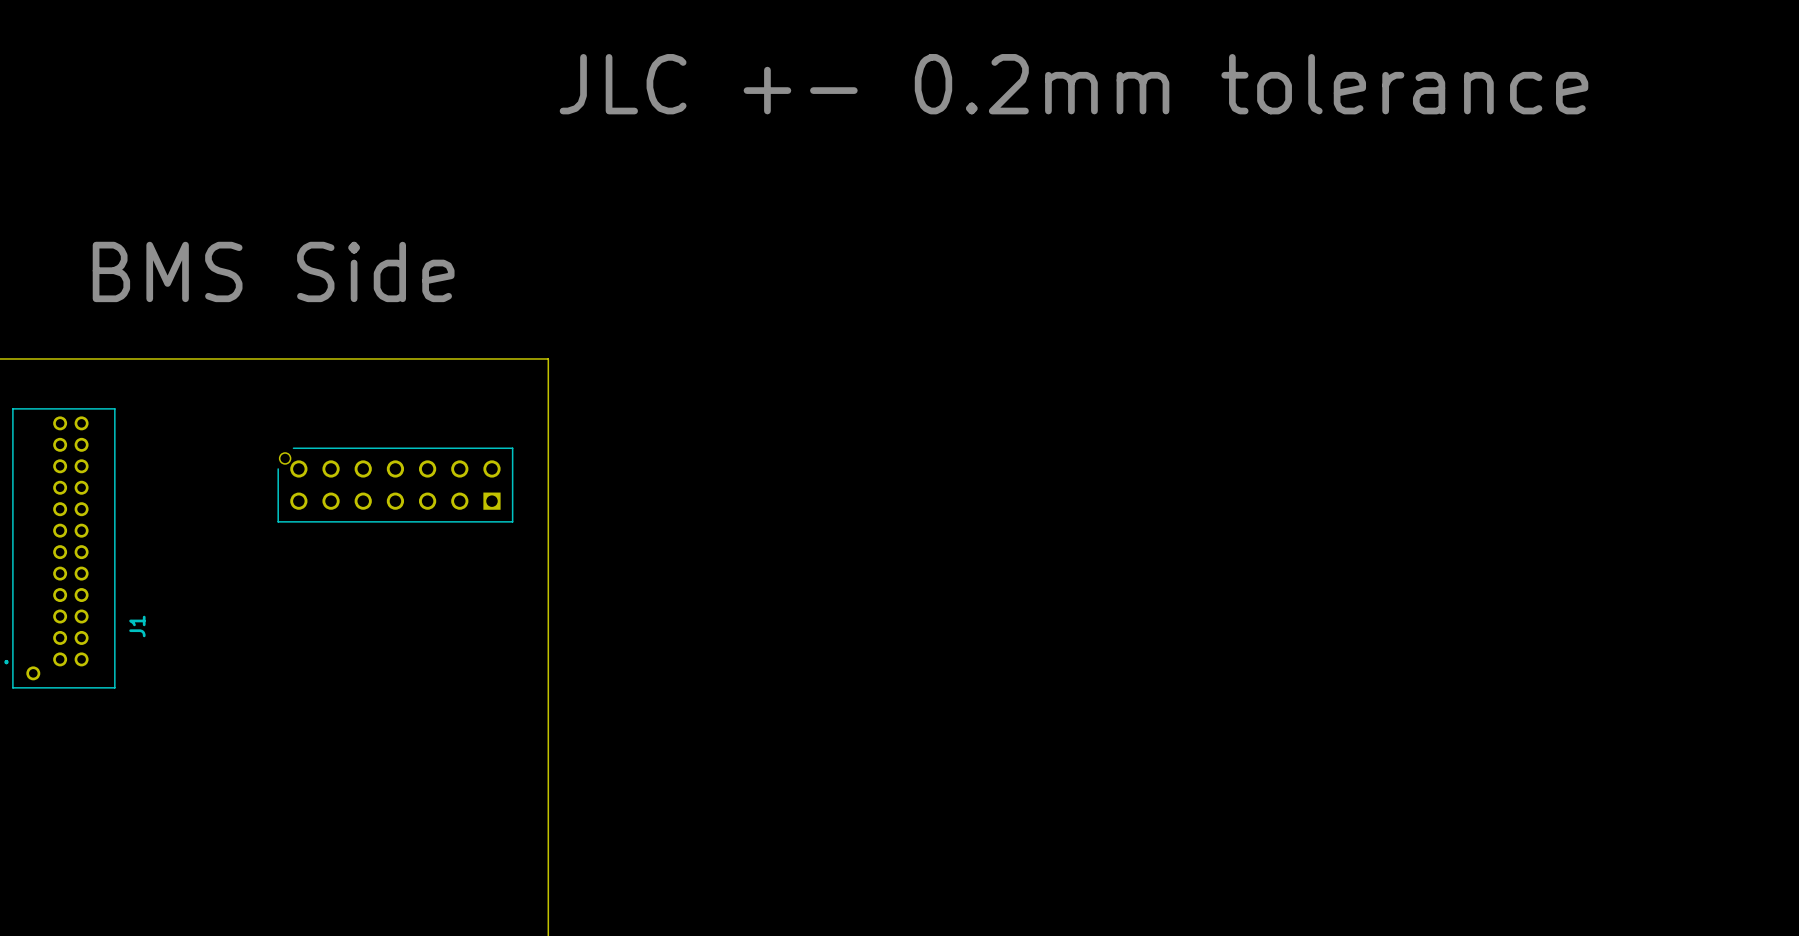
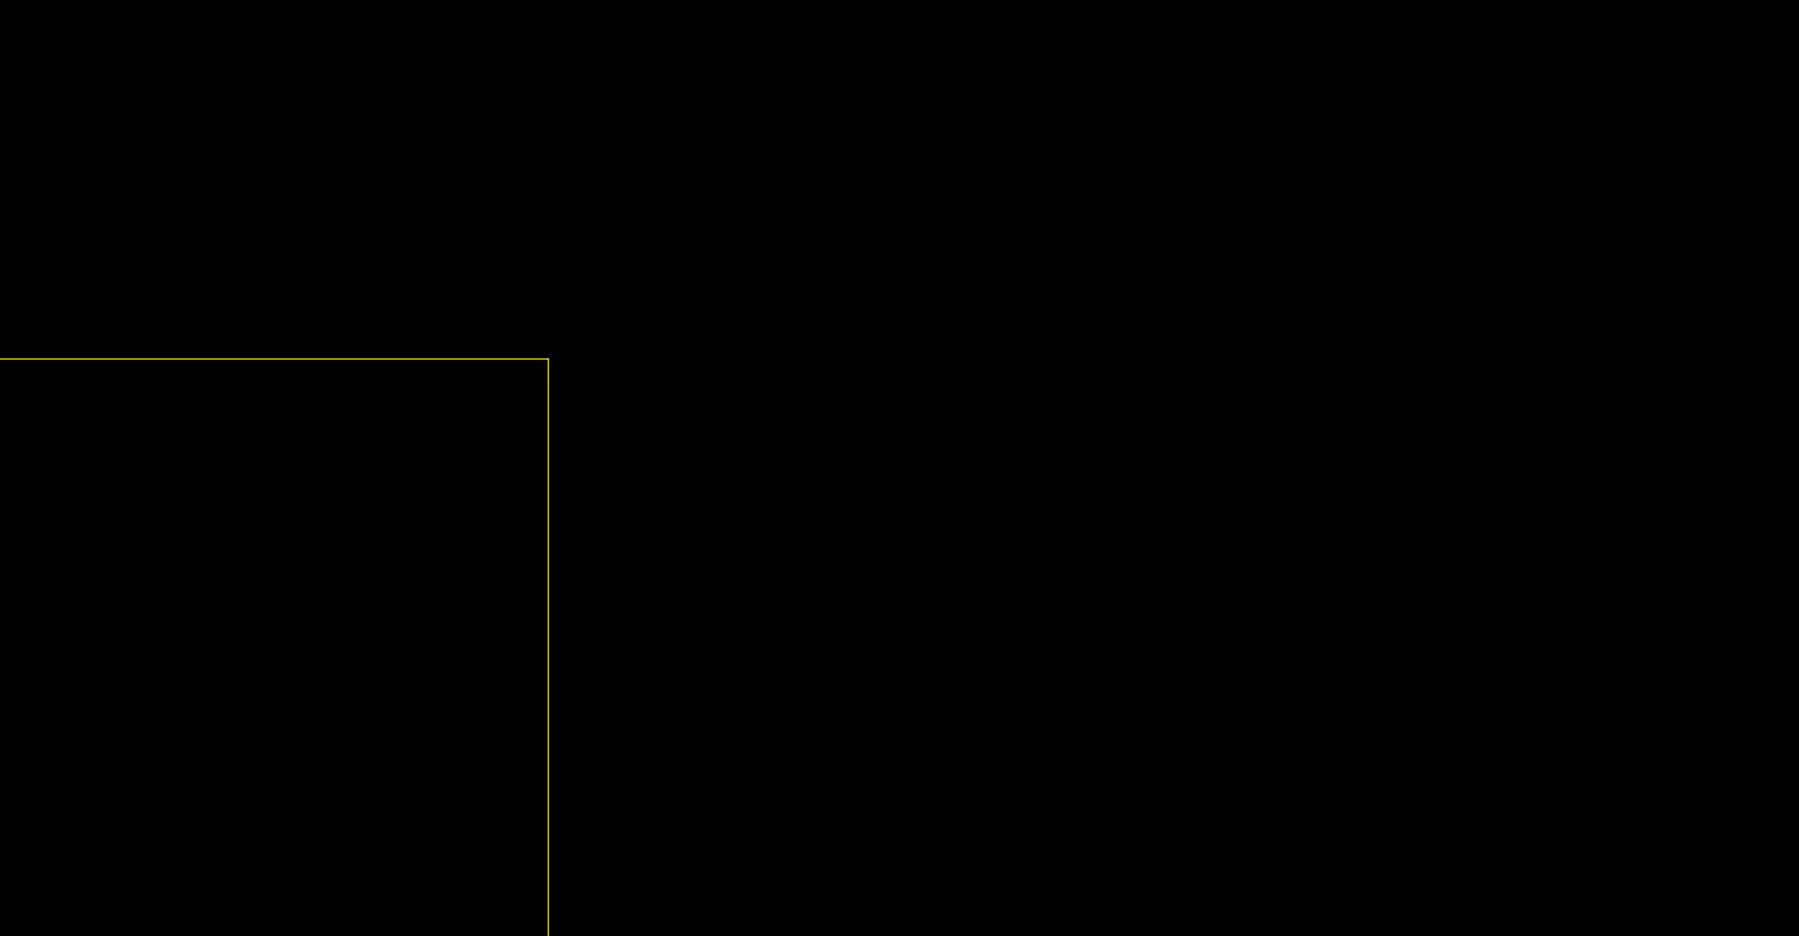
text: JLC +- 0.2mm tolerance (1074, 84) -> none
text: BMS Side (273, 271) -> none
part: (395, 485) -> none
J1: (59, 548) -> none

